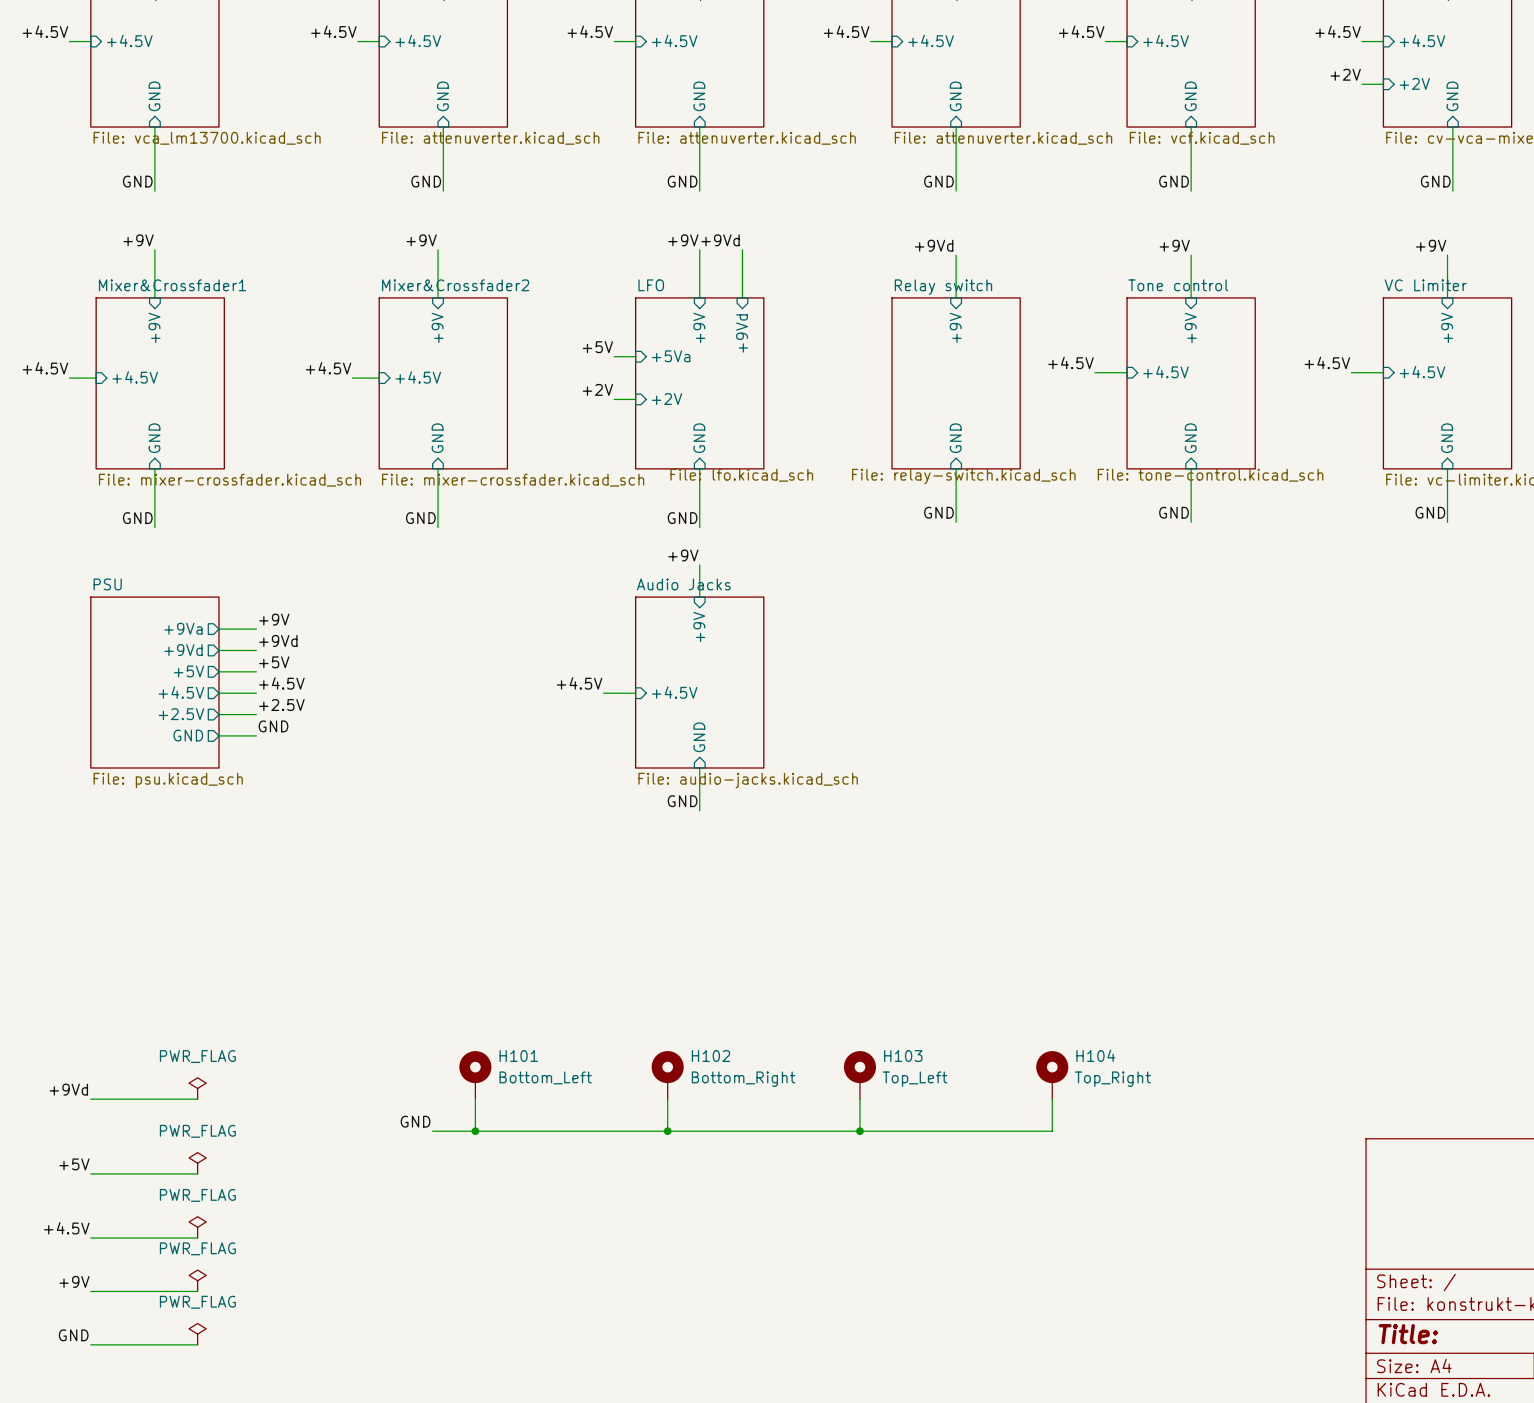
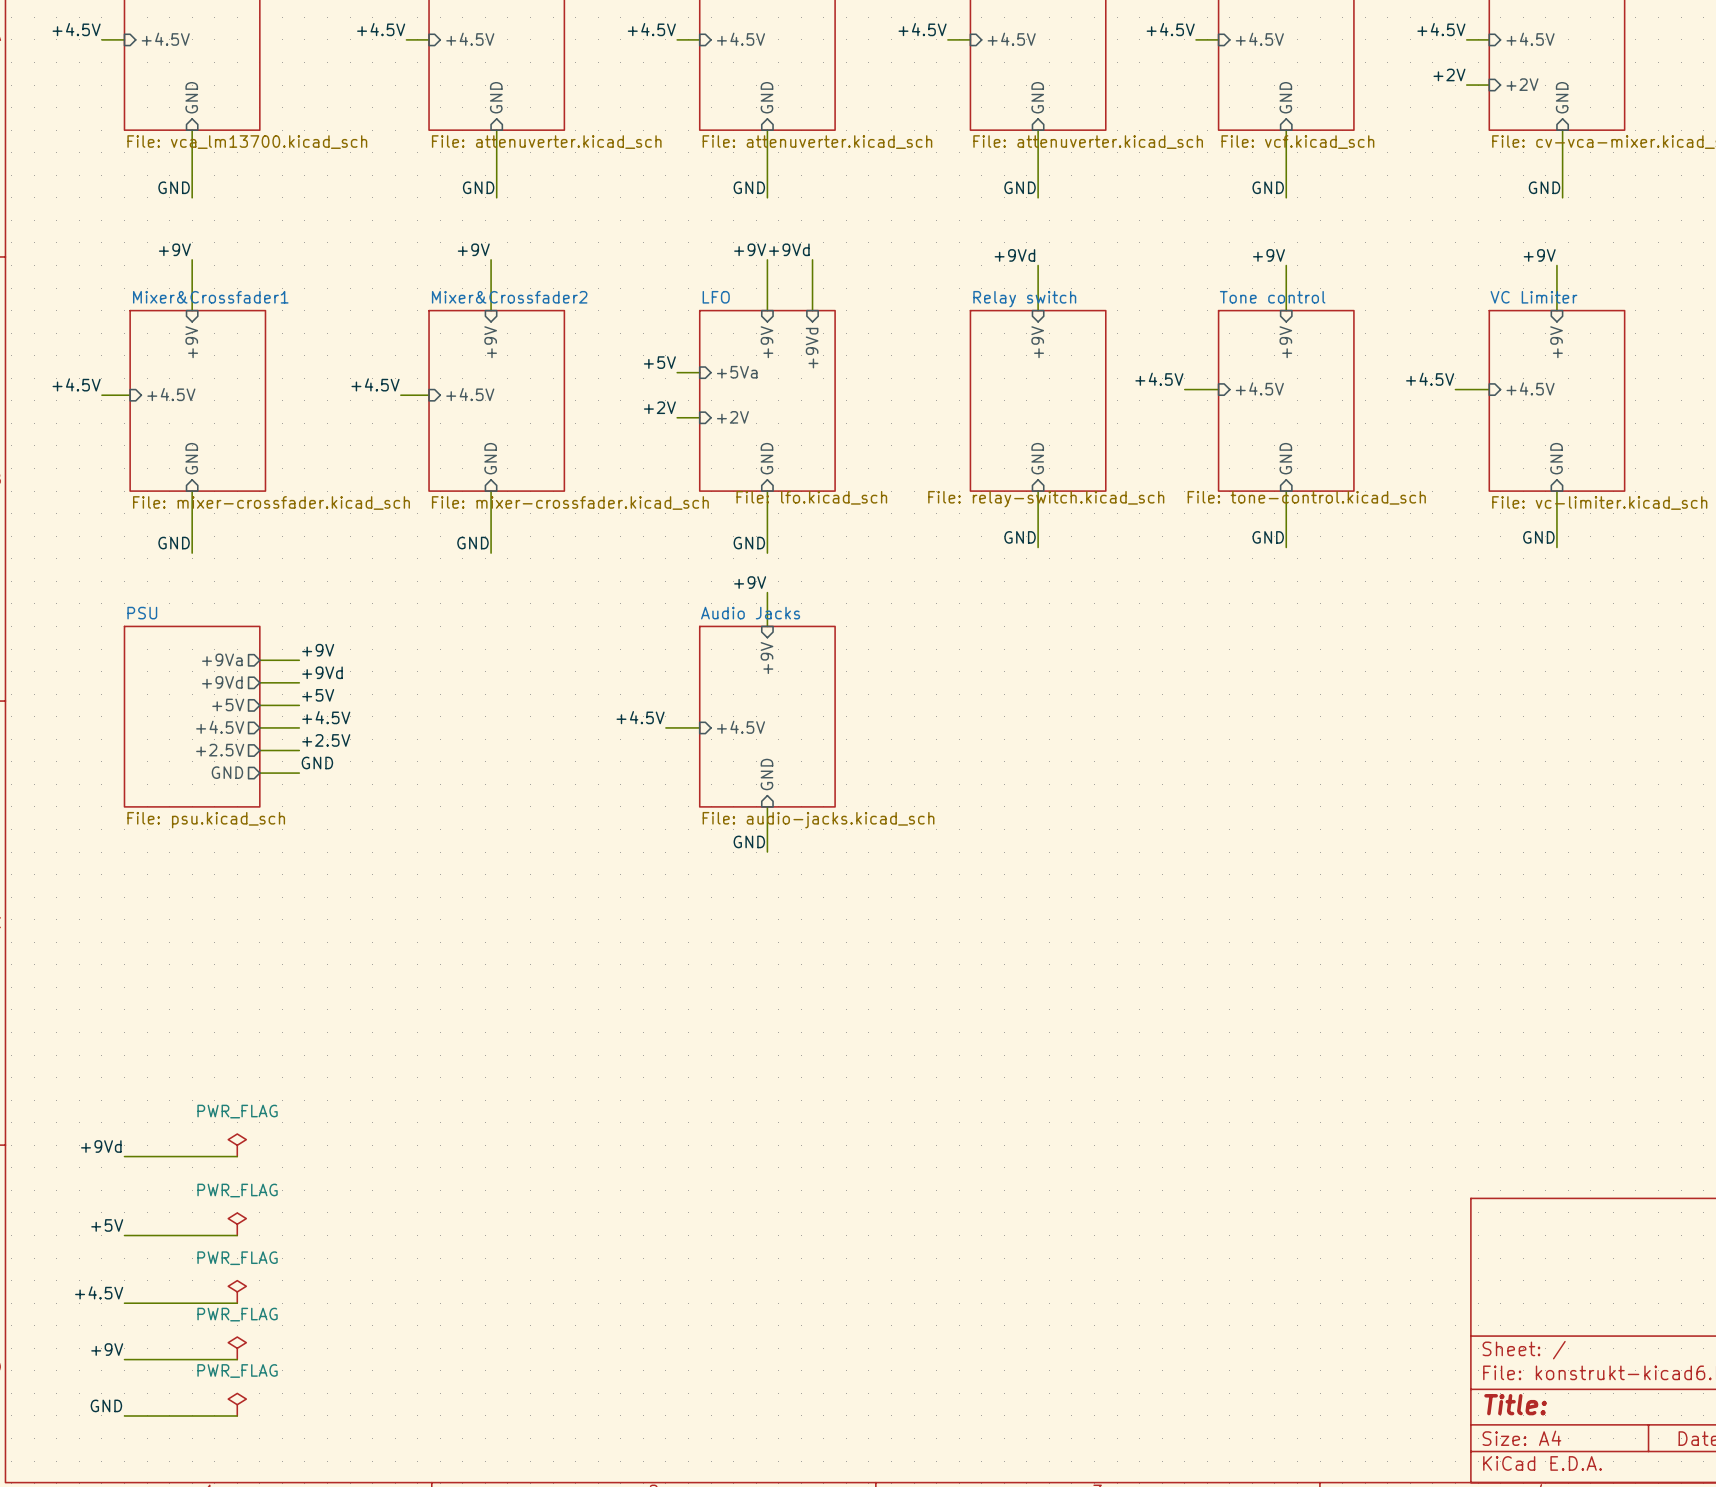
H101: Bottom_Left (475, 1075) -> none
H102: Bottom_Right (667, 1075) -> none
H103: Top_Left (859, 1075) -> none
H104: Top_Right (1052, 1075) -> none
wire: (475, 1099) (475, 1131) -> none
wire: (667, 1099) (667, 1131) -> none
wire: (859, 1099) (859, 1131) -> none
wire: (1052, 1099) (1052, 1131) (432, 1131) -> none
label: GND (415, 1121) -> none
junction: (475, 1131) -> none
junction: (667, 1131) -> none
junction: (859, 1131) -> none

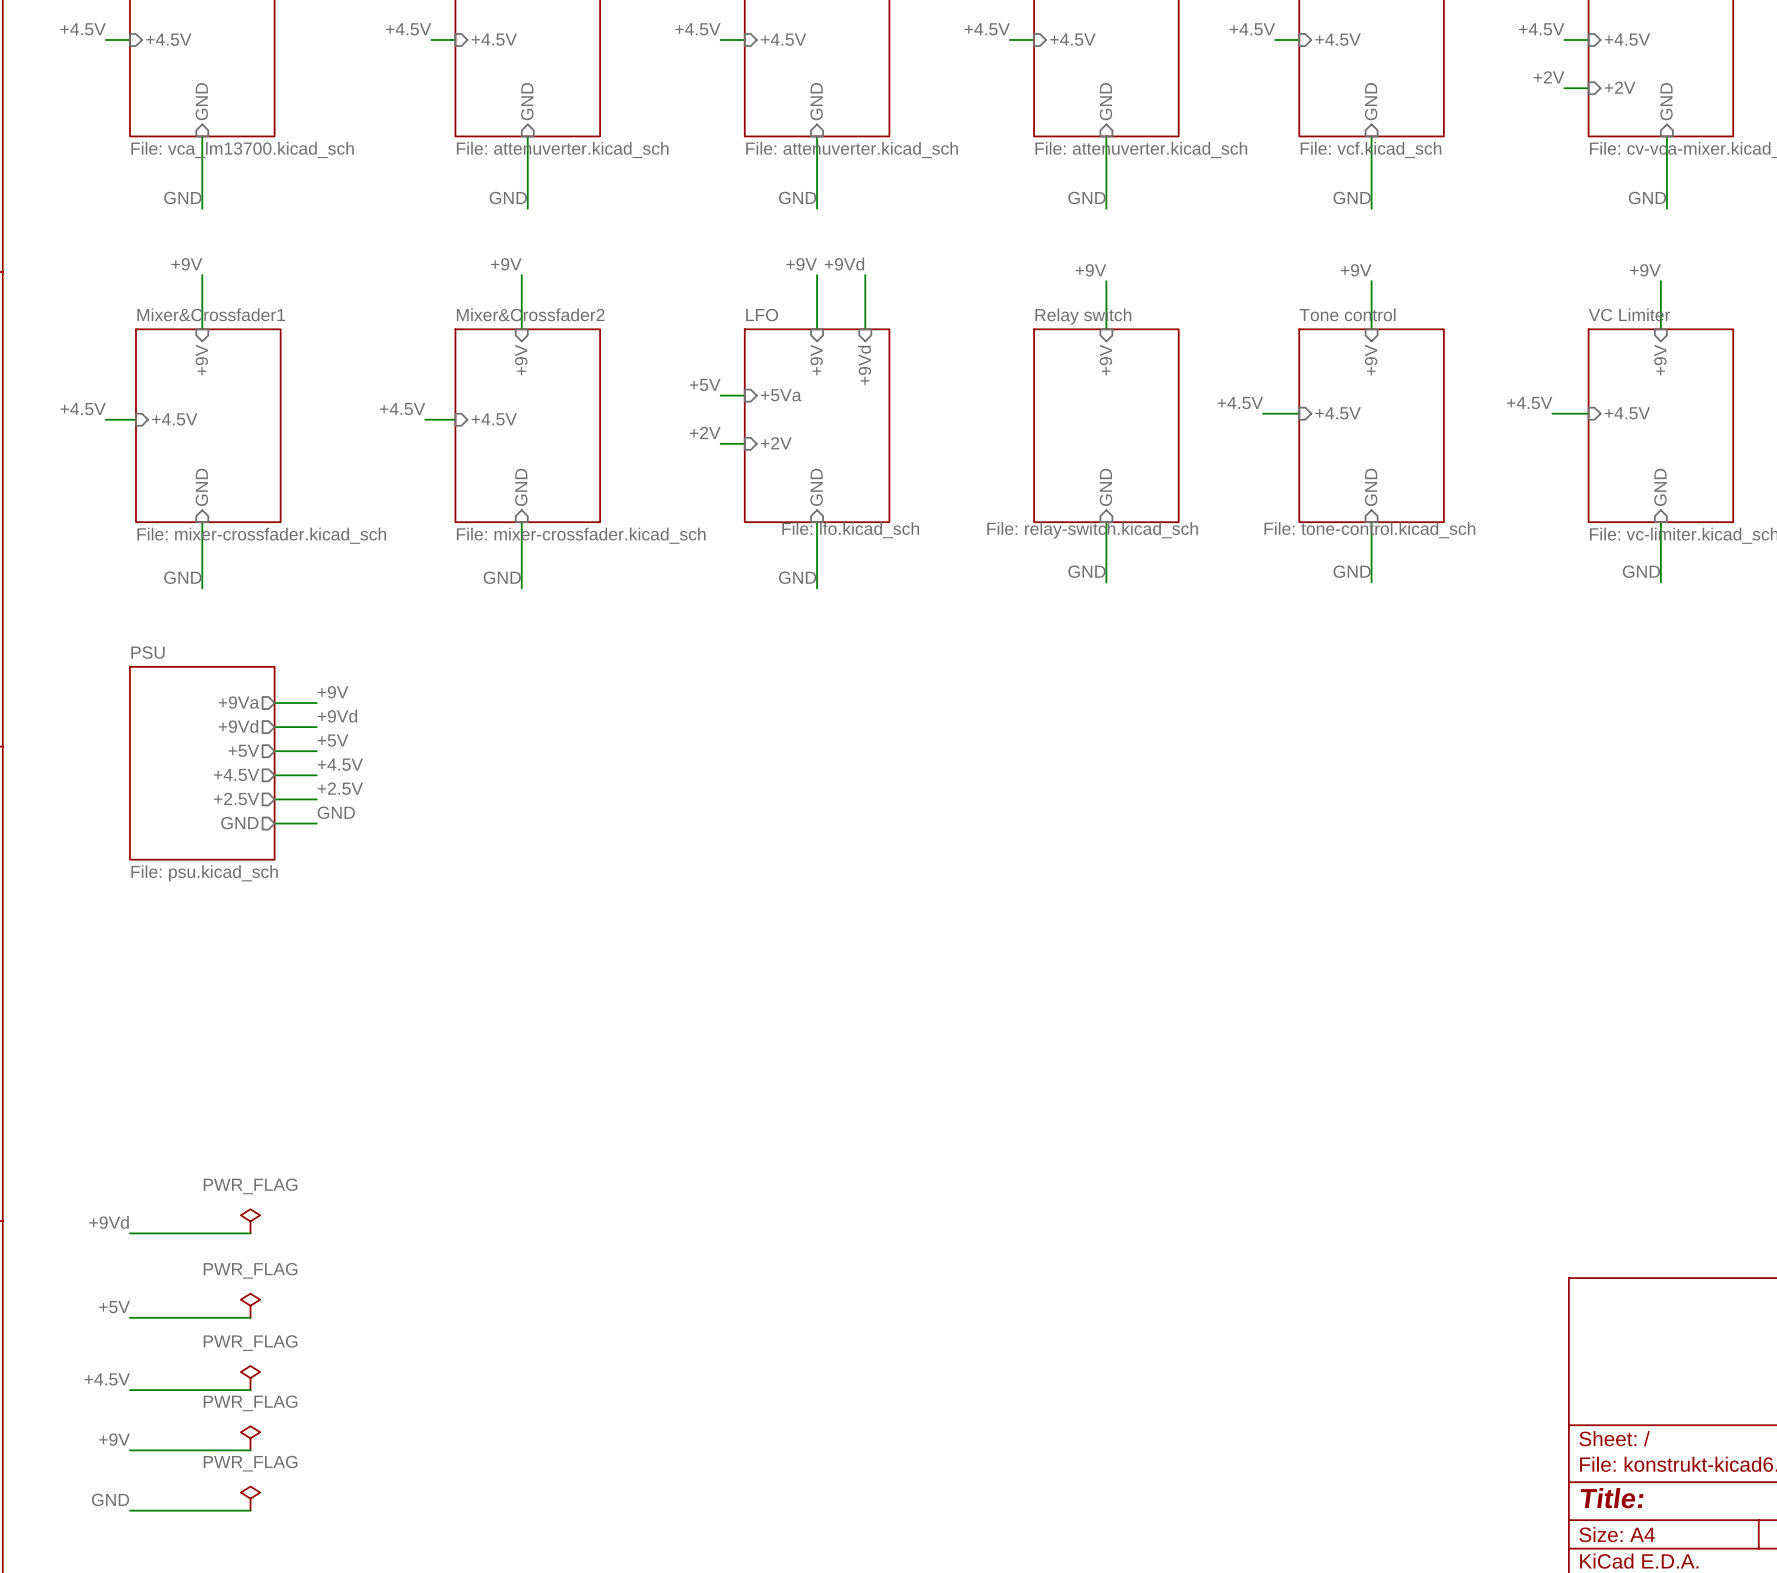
label: +9Vd (1014, 255) -> +9V (1090, 270)
label: +9V (750, 582) -> none
wire: (767, 592) (767, 626) -> none
sheet pin: +9V (766, 658) -> none
sheet Audio Jacks: File: audio-jacks.kicad_sch (767, 716) -> none
label: +4.5V (640, 717) -> none
wire: (665, 727) (699, 727) -> none
sheet pin: +4.5V (740, 727) -> none
sheet pin: GND (766, 774) -> none
wire: (767, 806) (767, 852) -> none
label: GND (749, 841) -> none

